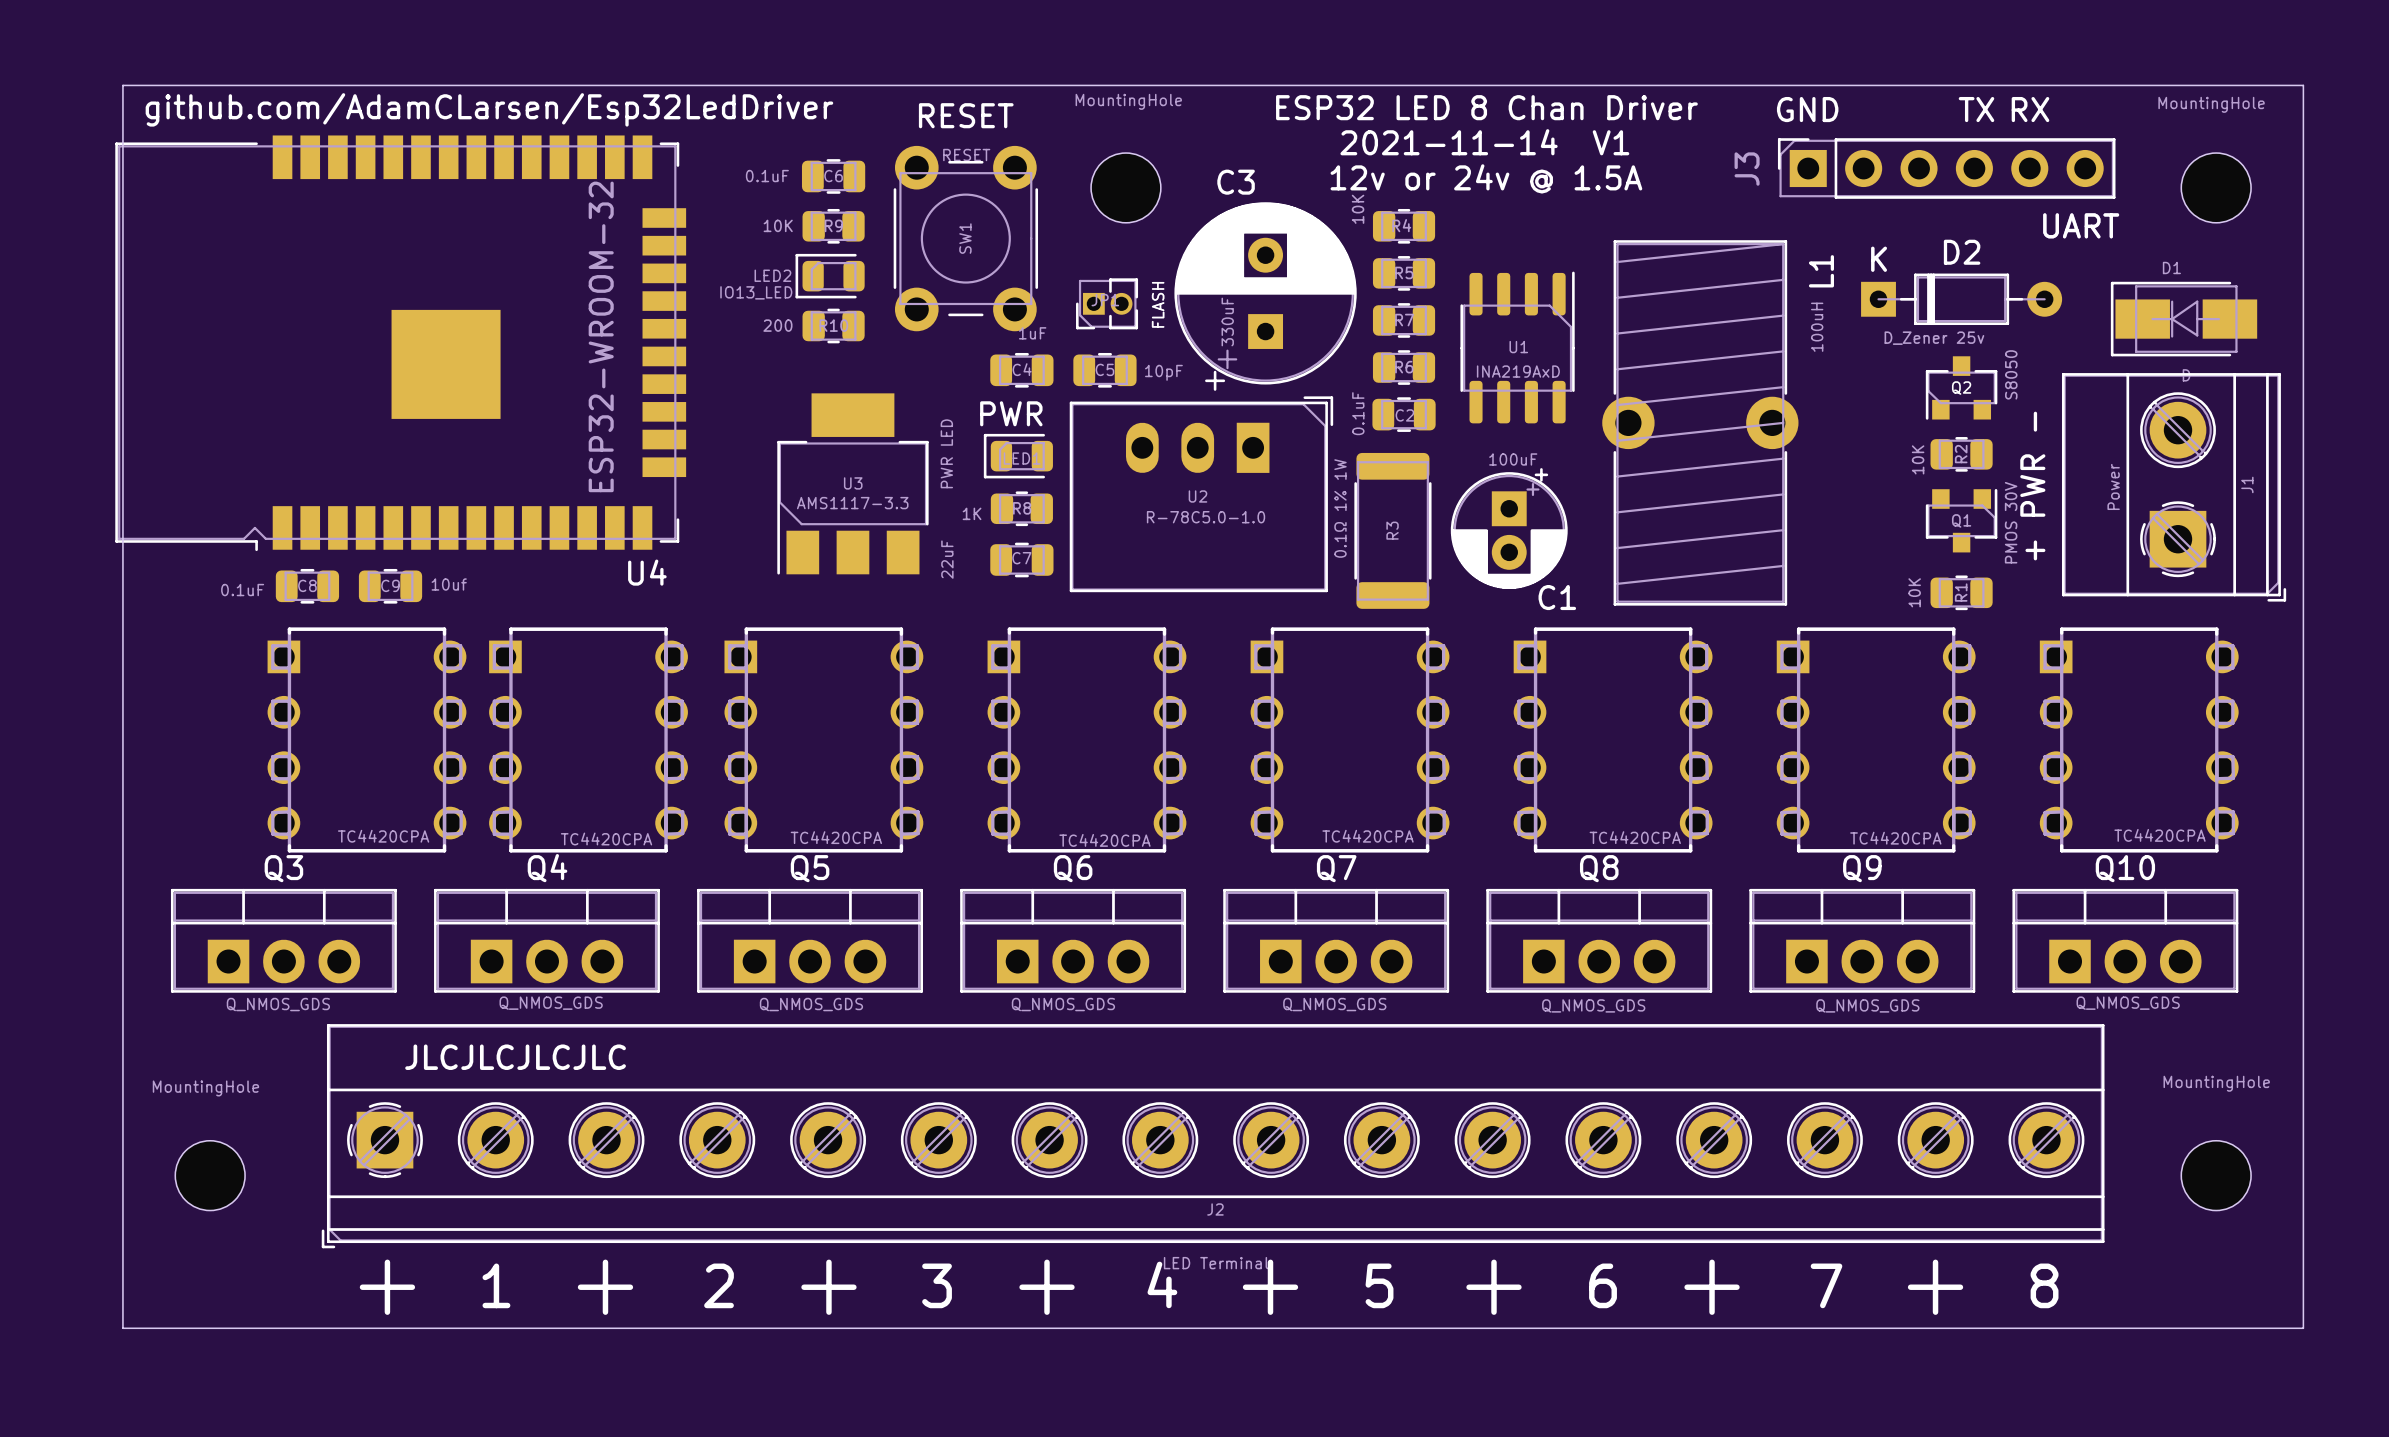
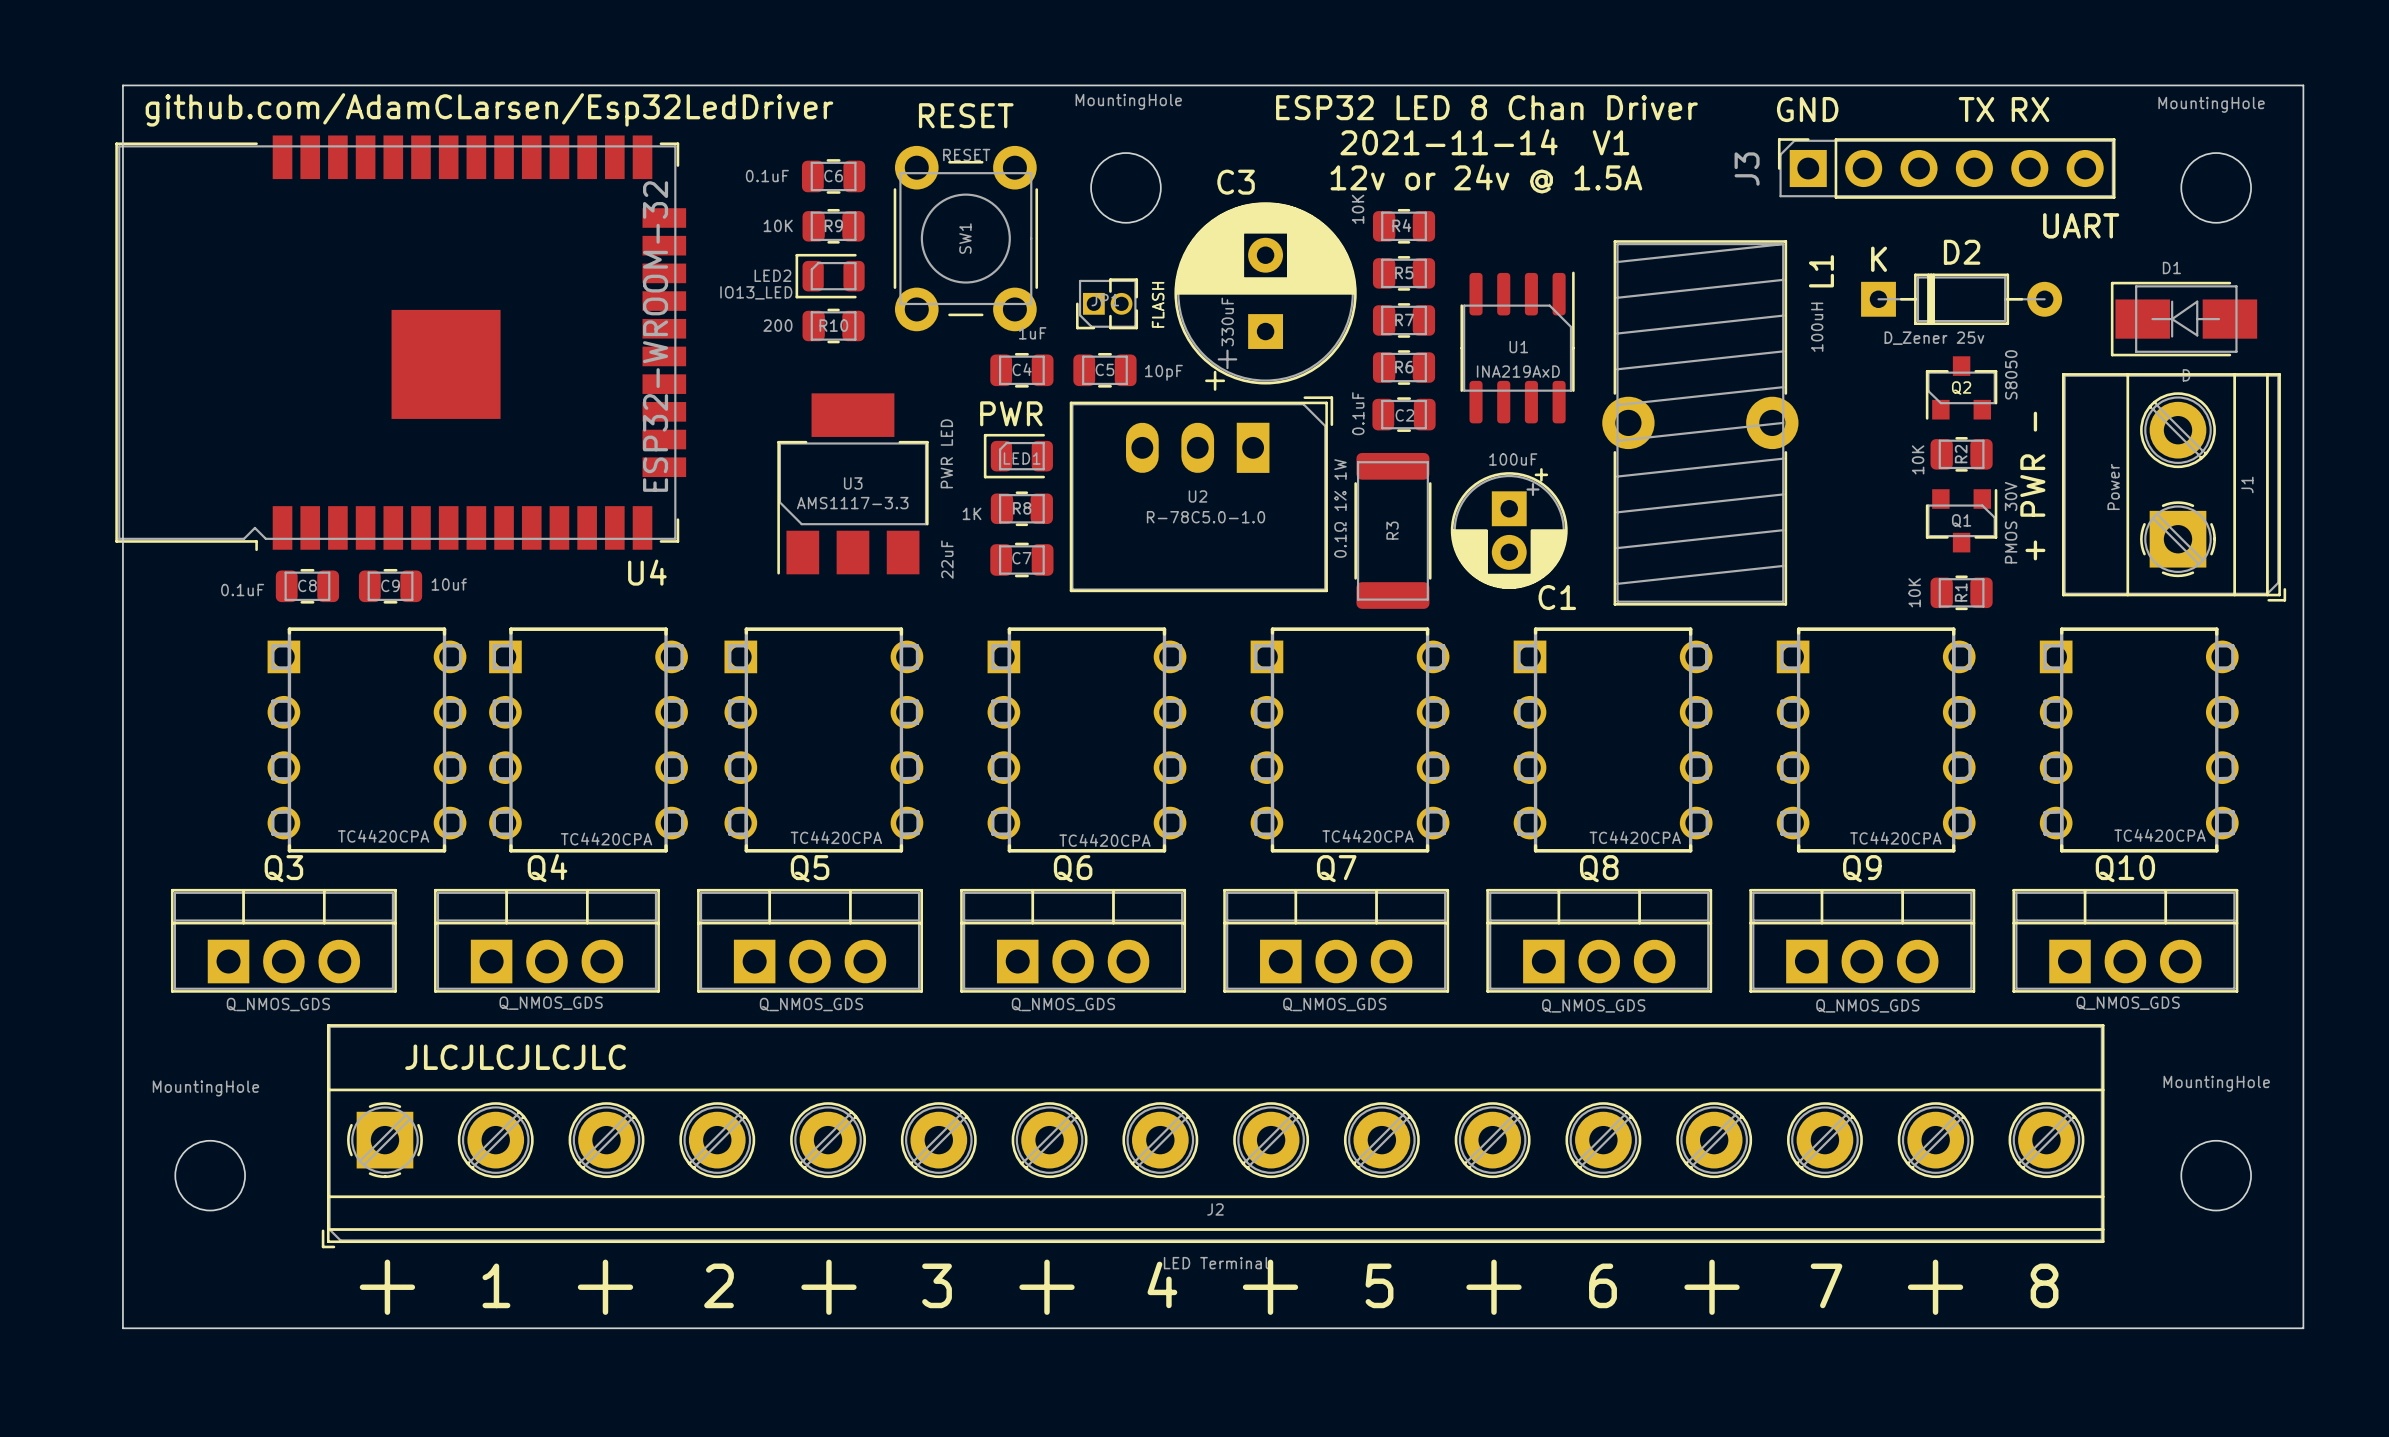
U4 value position: ESP32-WROOM-32 (601, 336) -> ESP32-WROOM-32 (655, 336)

